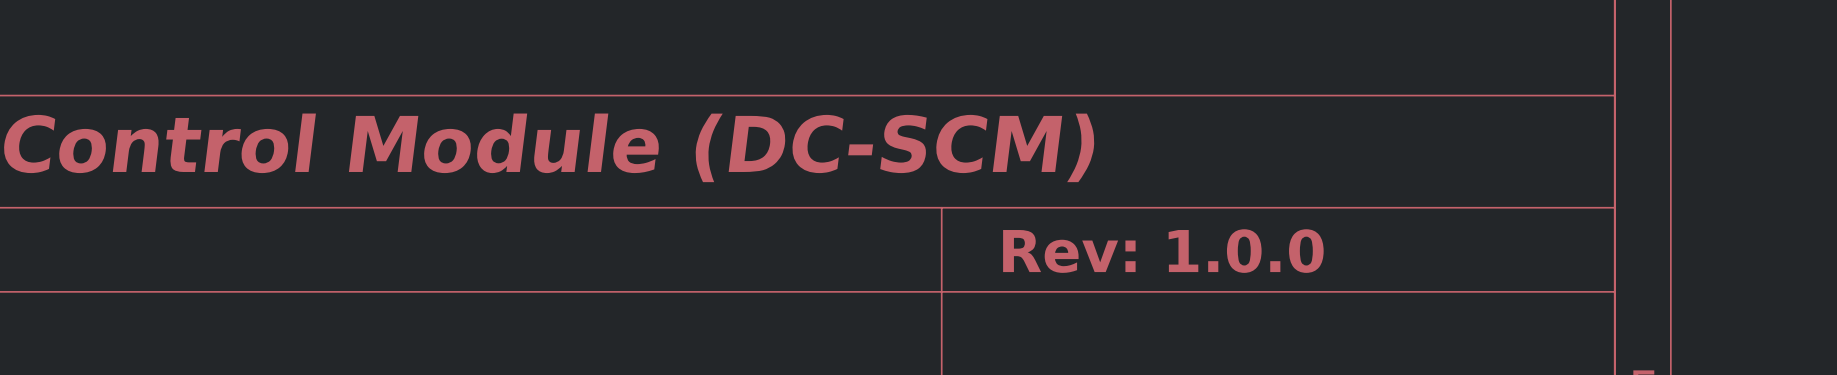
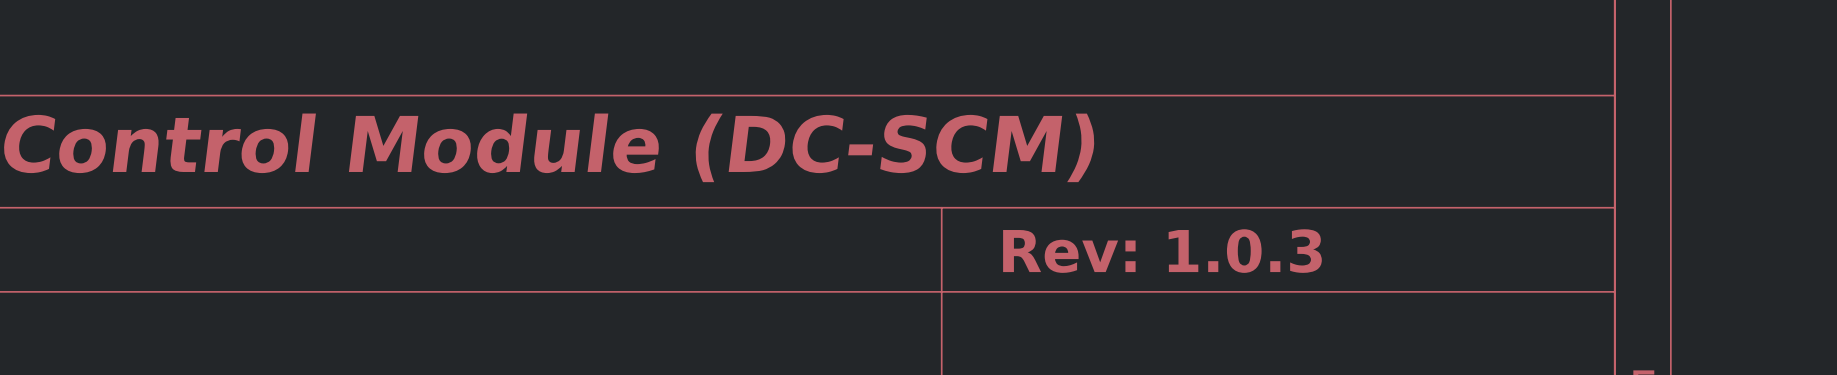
title block: Rev: 1.0.0 (1163, 251) -> Rev: 1.0.3 (1162, 251)

